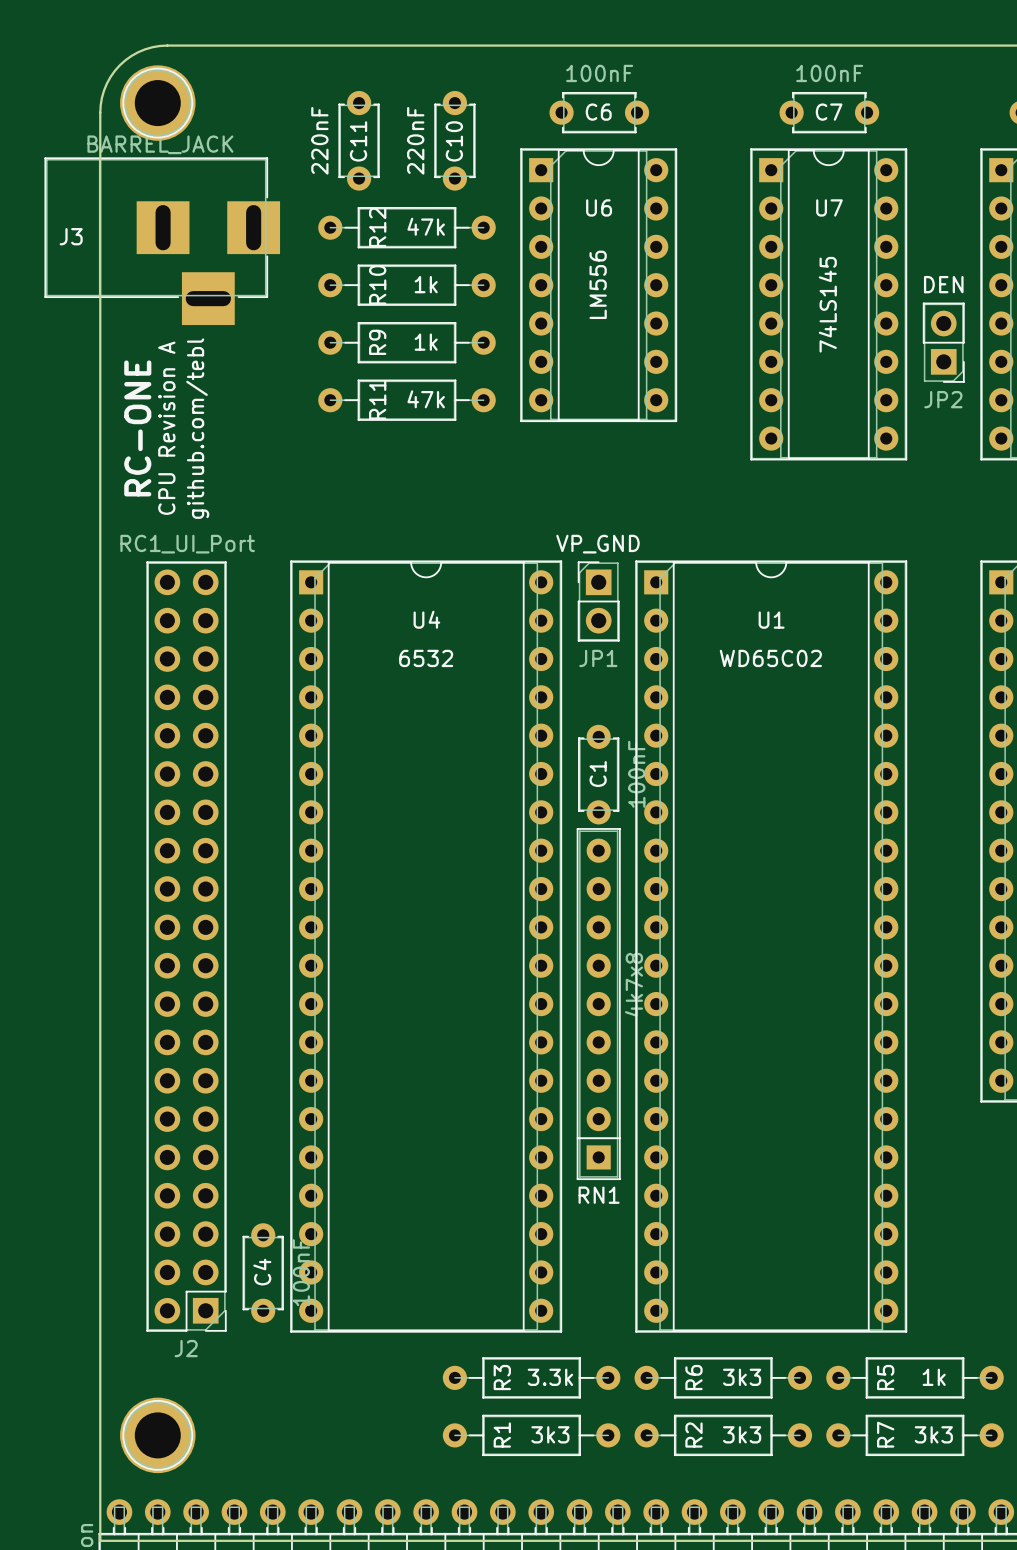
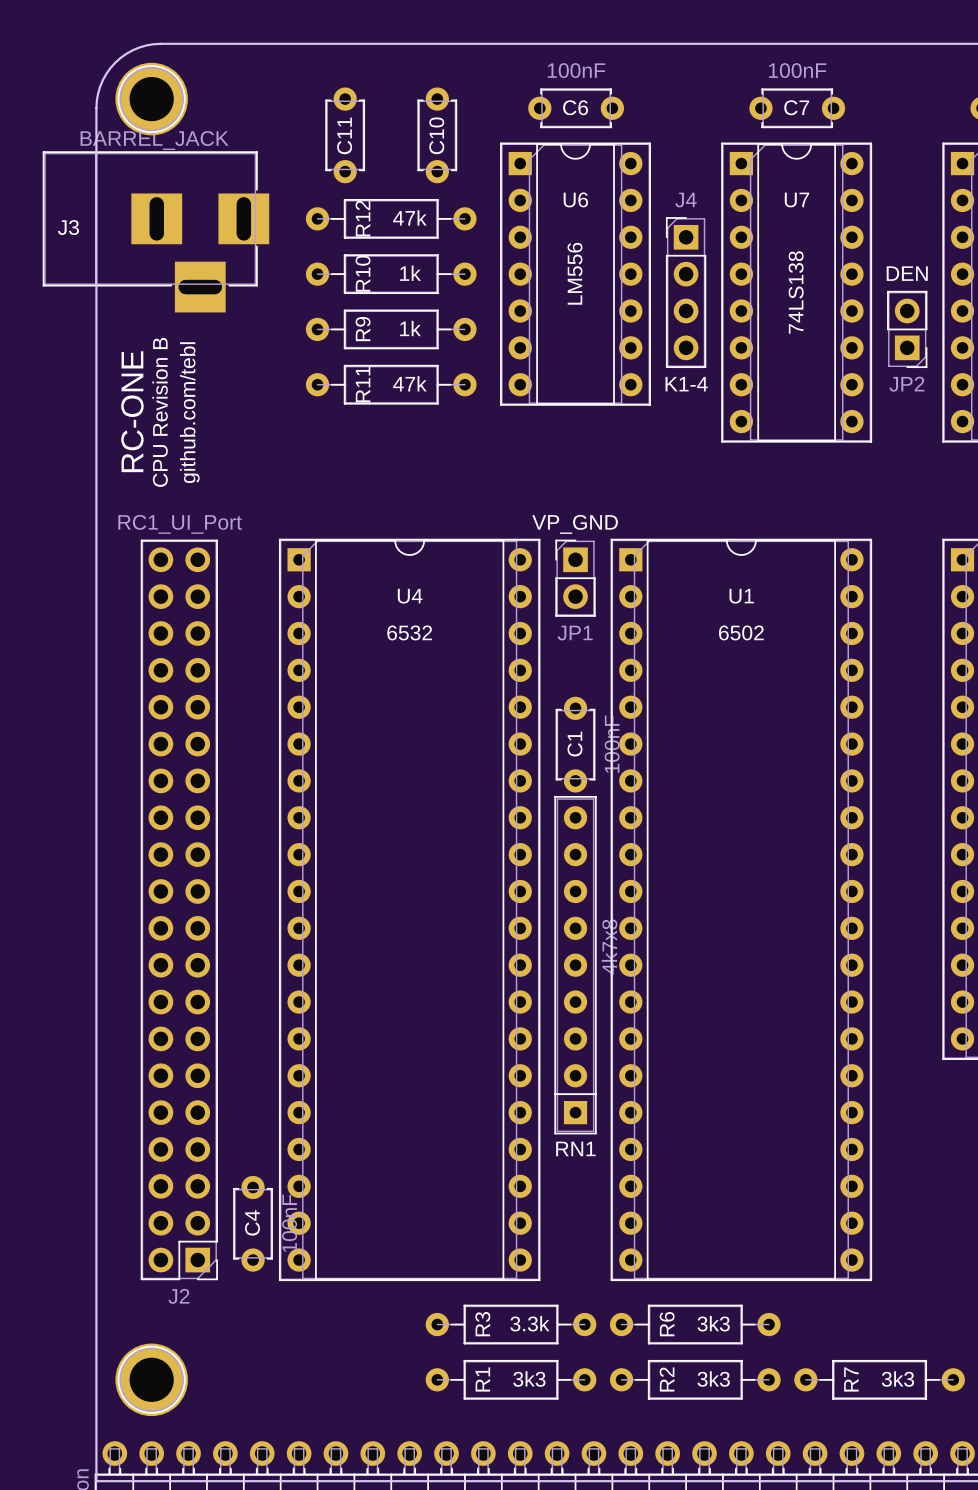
C11 value: 220nF (319, 140) -> none
C10 value: 220nF (415, 140) -> none
J4: none -> K1-4 (686, 292)
U7 value: 74LS145 (827, 304) -> 74LS138 (796, 292)
text: CPU Revision A (166, 428) -> CPU Revision B (160, 412)
U1 value: WD65C02 (770, 658) -> 6502 (741, 632)
R5: 1k (915, 1377) -> none

